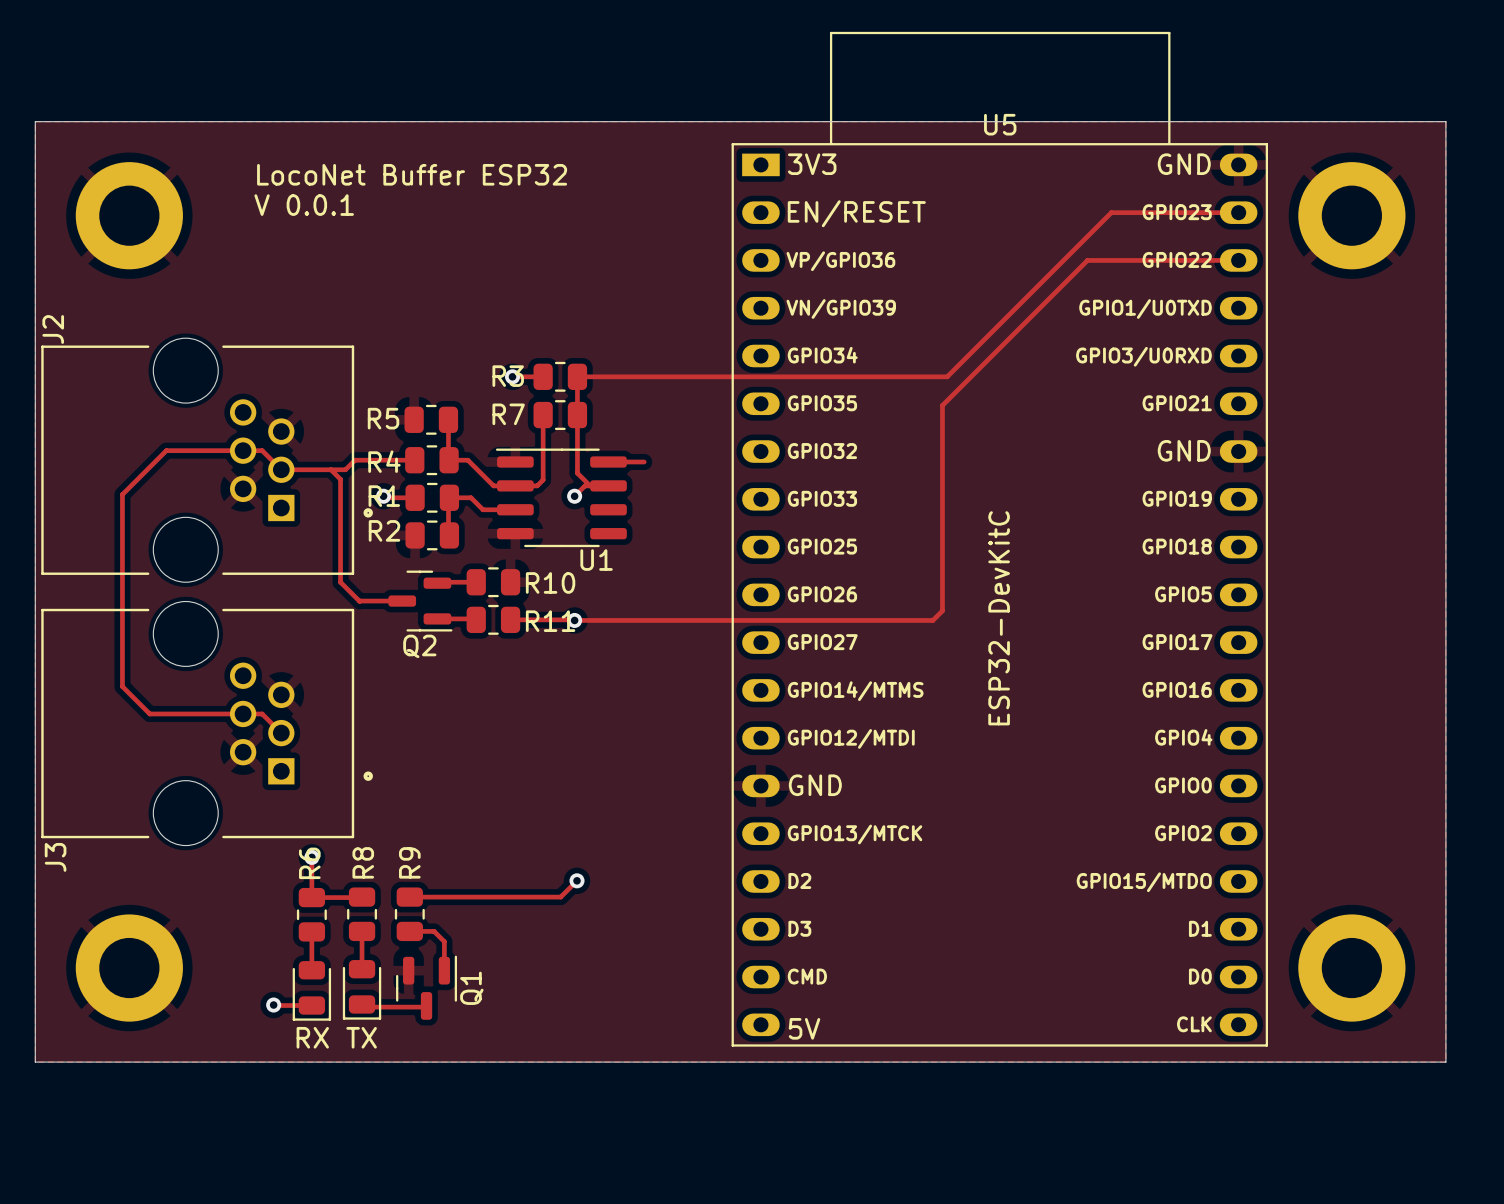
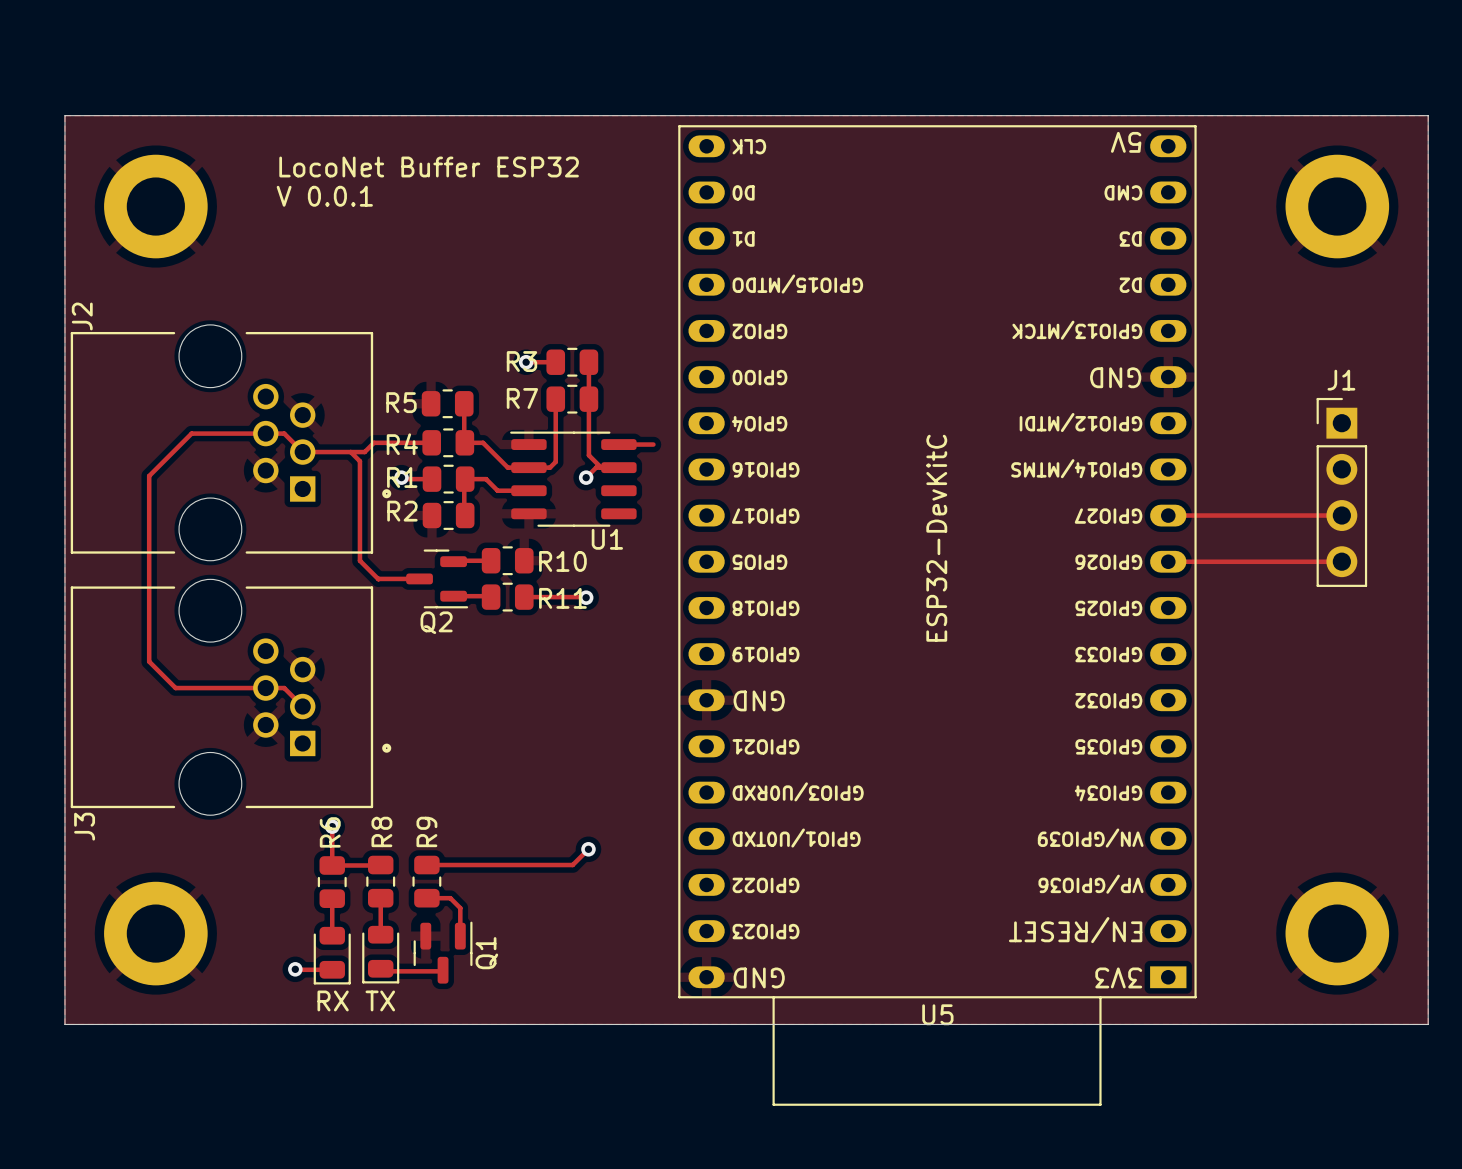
track: (1238, 212) (1111, 212) (947, 376) (577, 376) -> none
track: (1238, 260) (1087, 260) (942, 405) (942, 610) (932, 620) (574, 620) -> none
J1: none -> (1341, 492)
track: none -> (1168, 515) (1341, 515)
U5 rotation: 0° (999, 539) -> 180° (937, 615)
track: none -> (1168, 561) (1341, 561)

